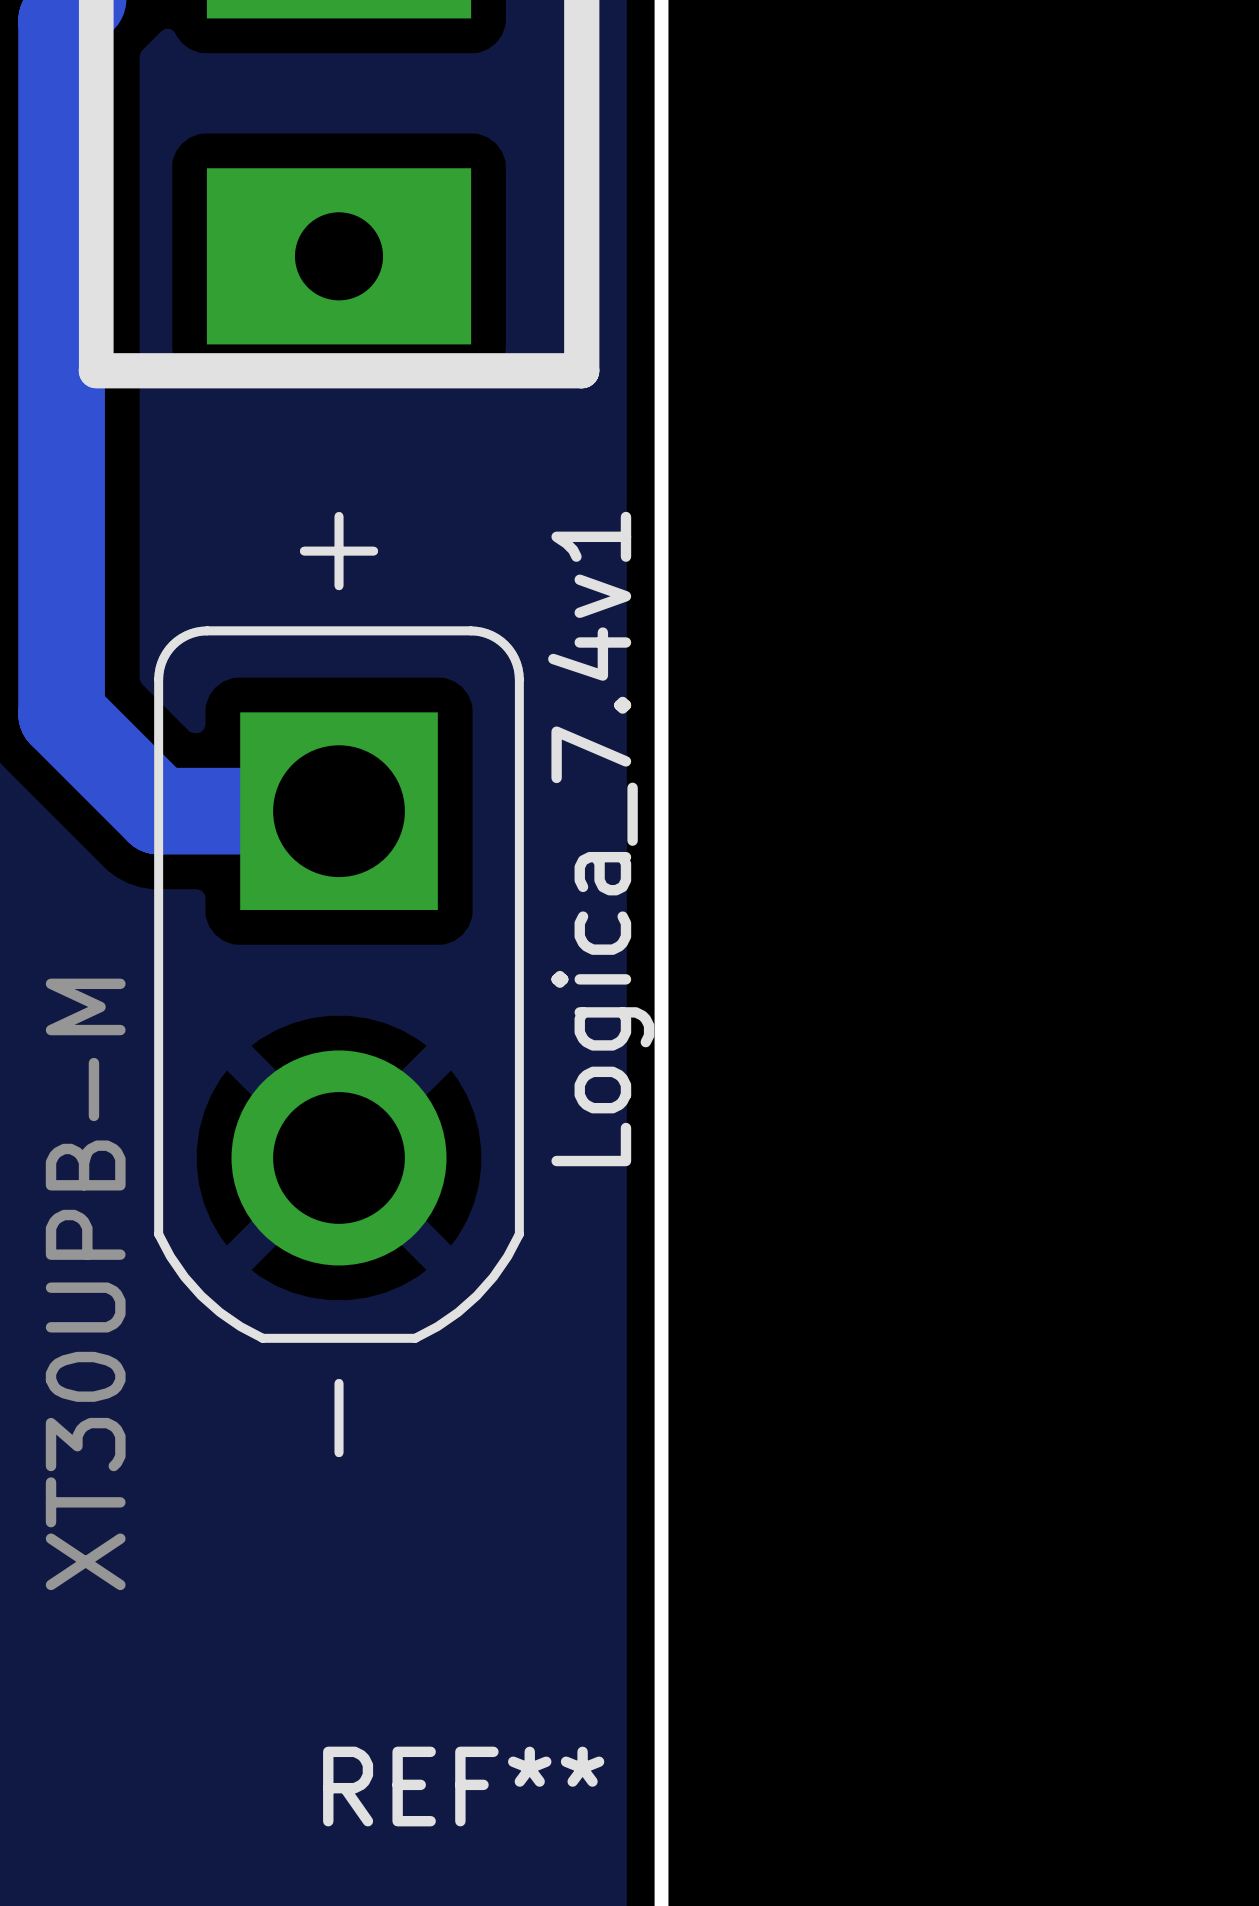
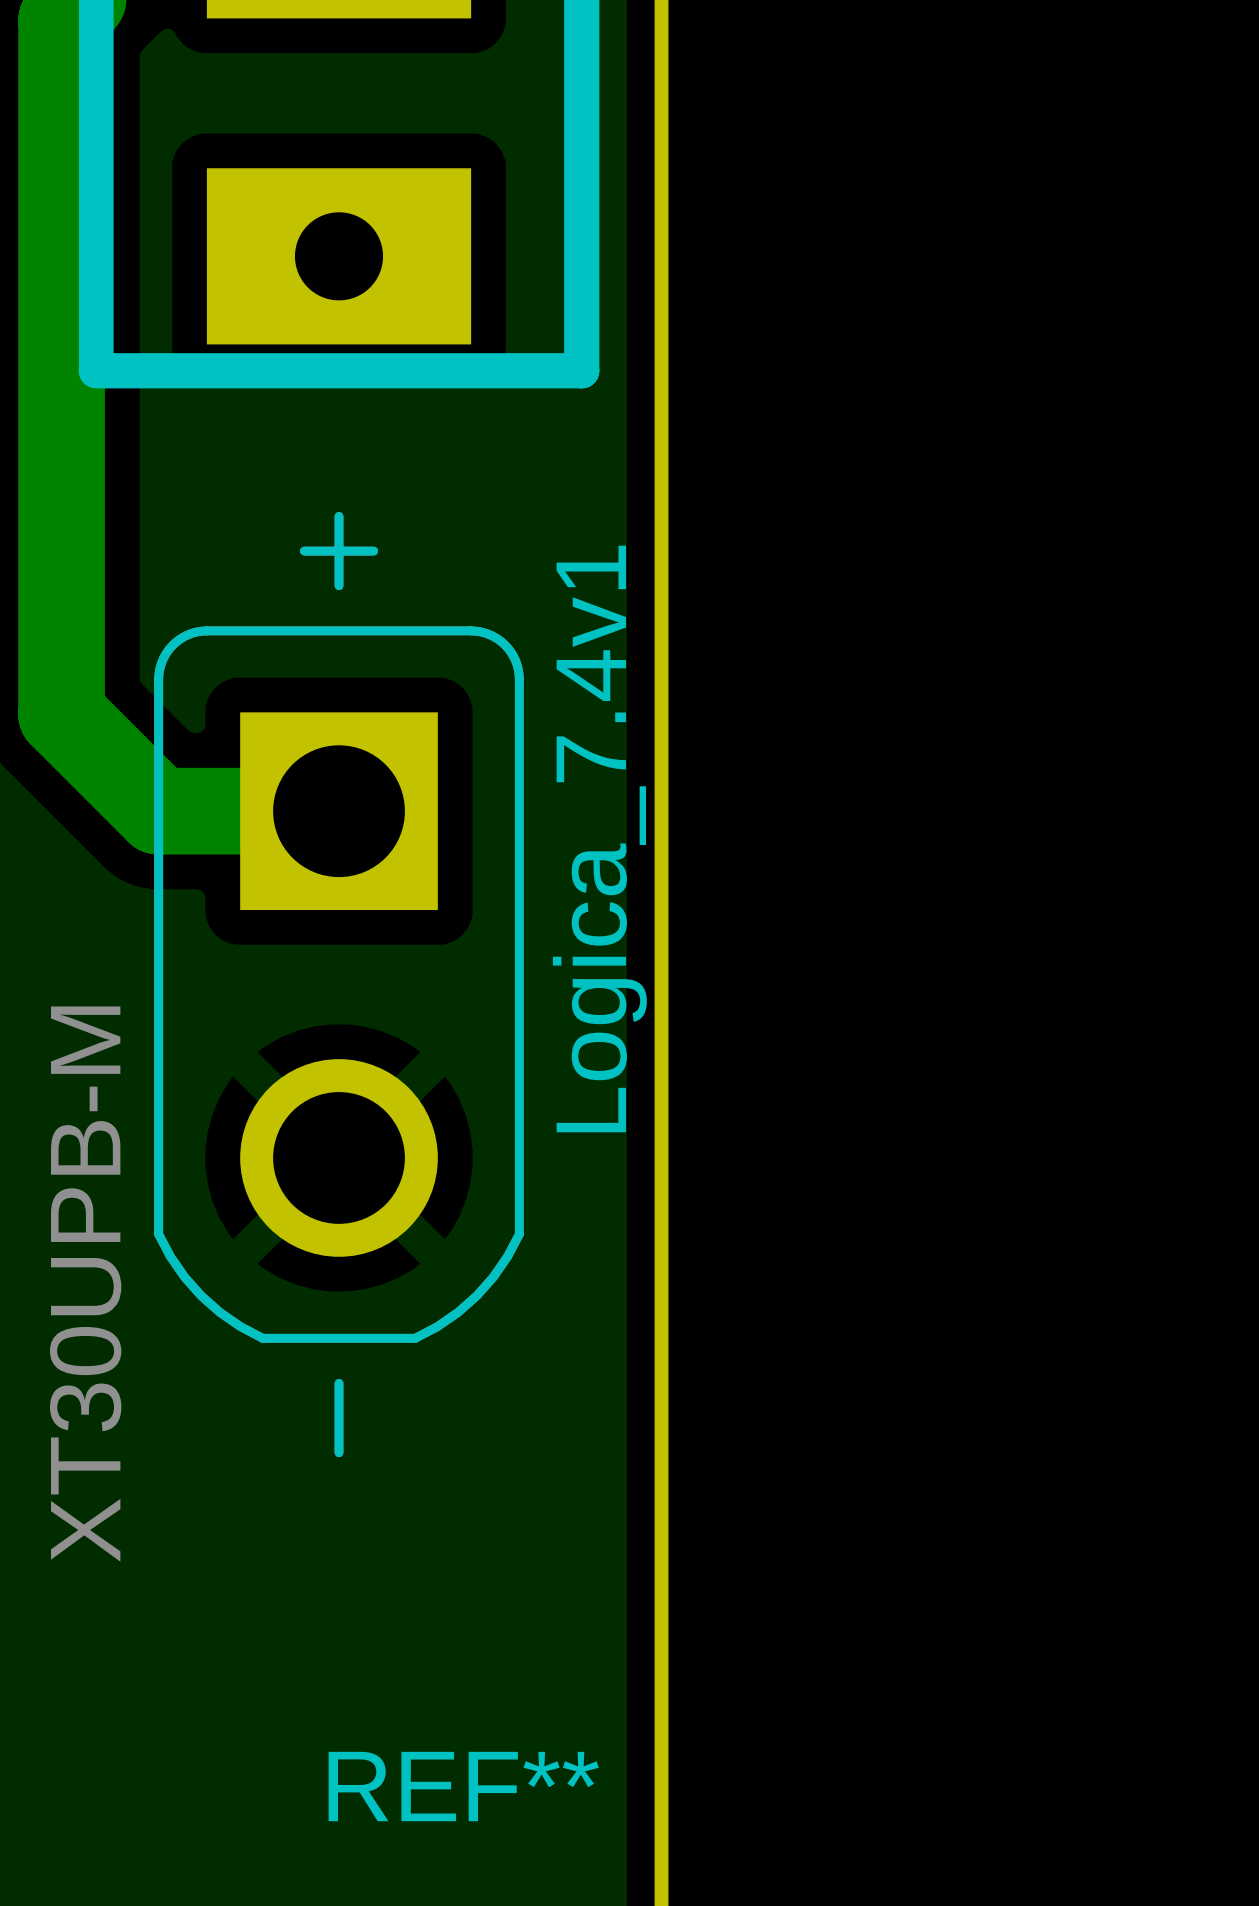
Logica_7.4v1 footprint: [154, 512, 524, 1458] -> [154, 512, 524, 1458]

